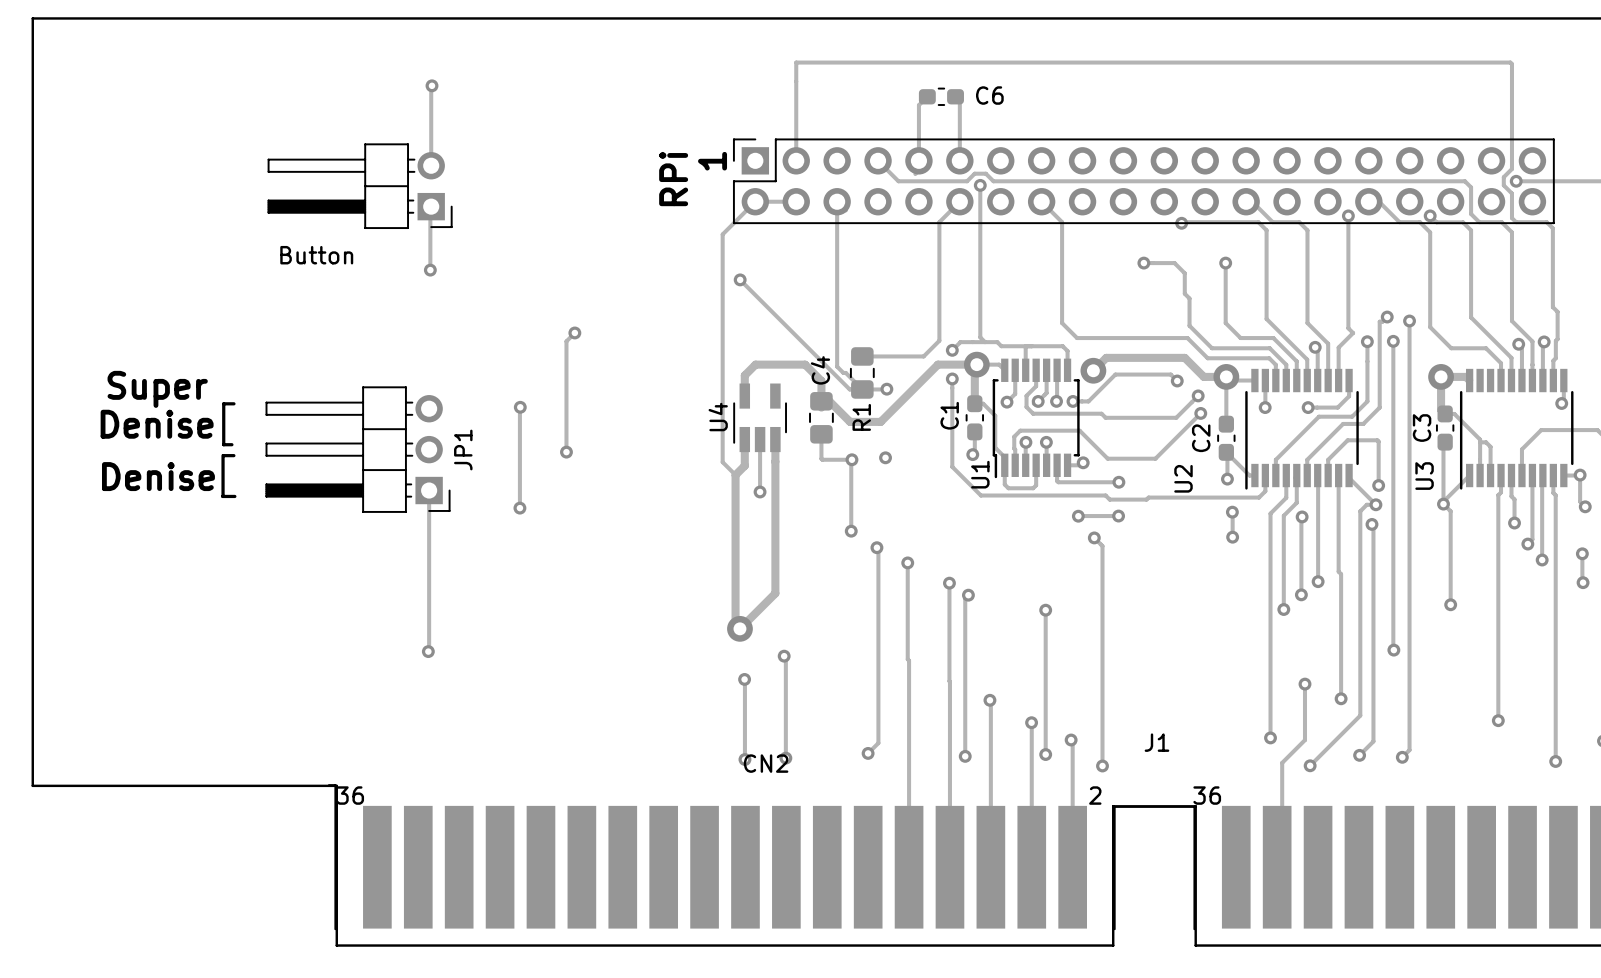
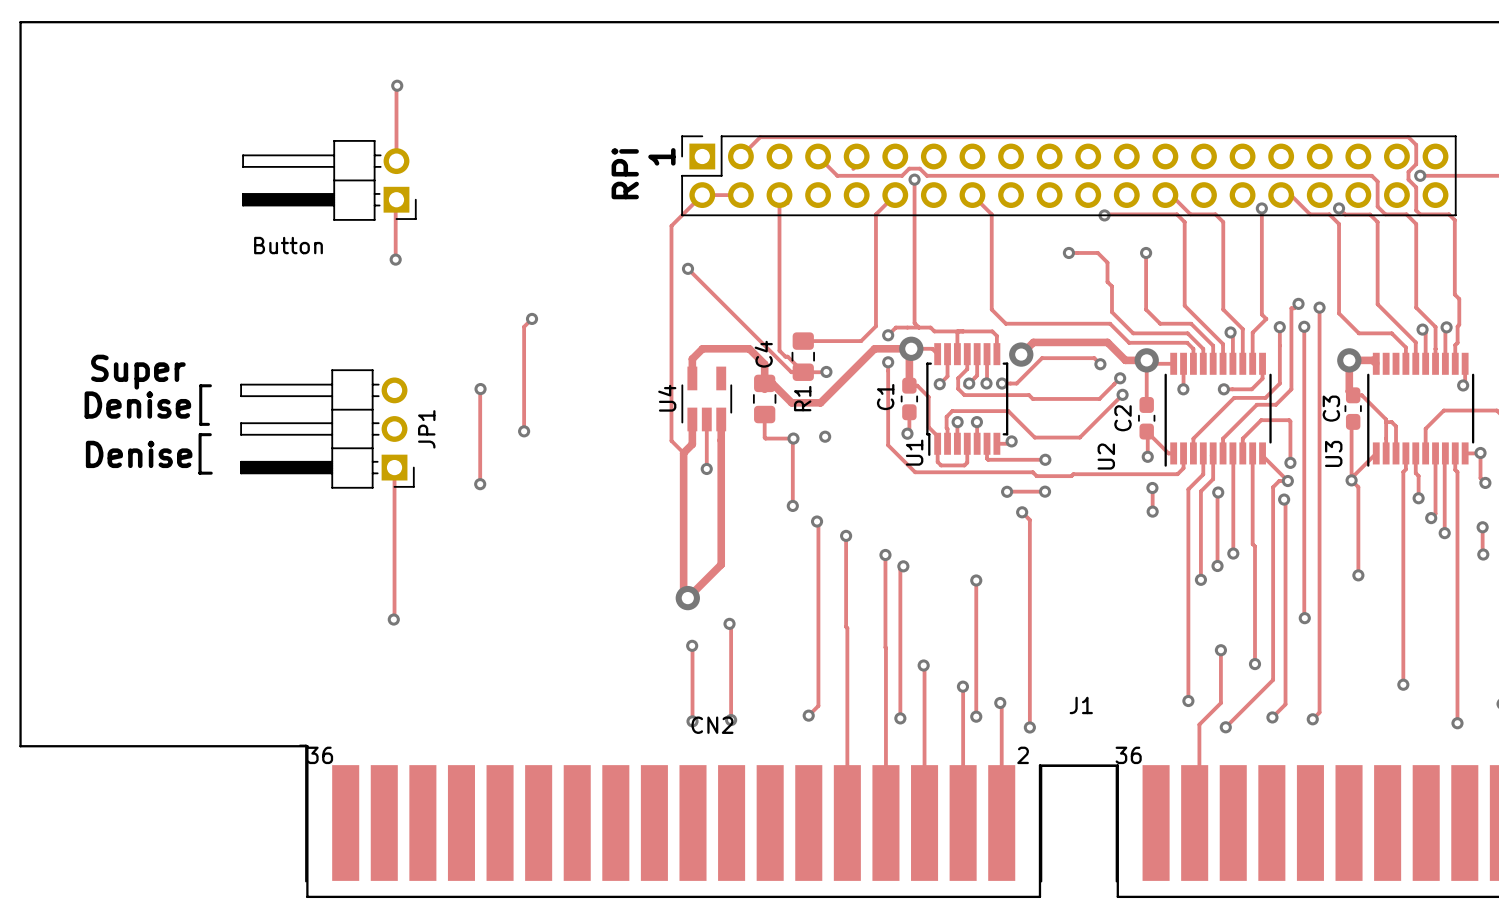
track: (927, 96) (918, 105) (918, 160) -> none
C6: (941, 96) -> none
track: (955, 96) (959, 101) (959, 160) -> none
track: (1511, 148) (1511, 64) (1510, 62) (796, 62) (796, 160) -> (1416, 144) (1408, 137) (760, 137) (740, 156)

